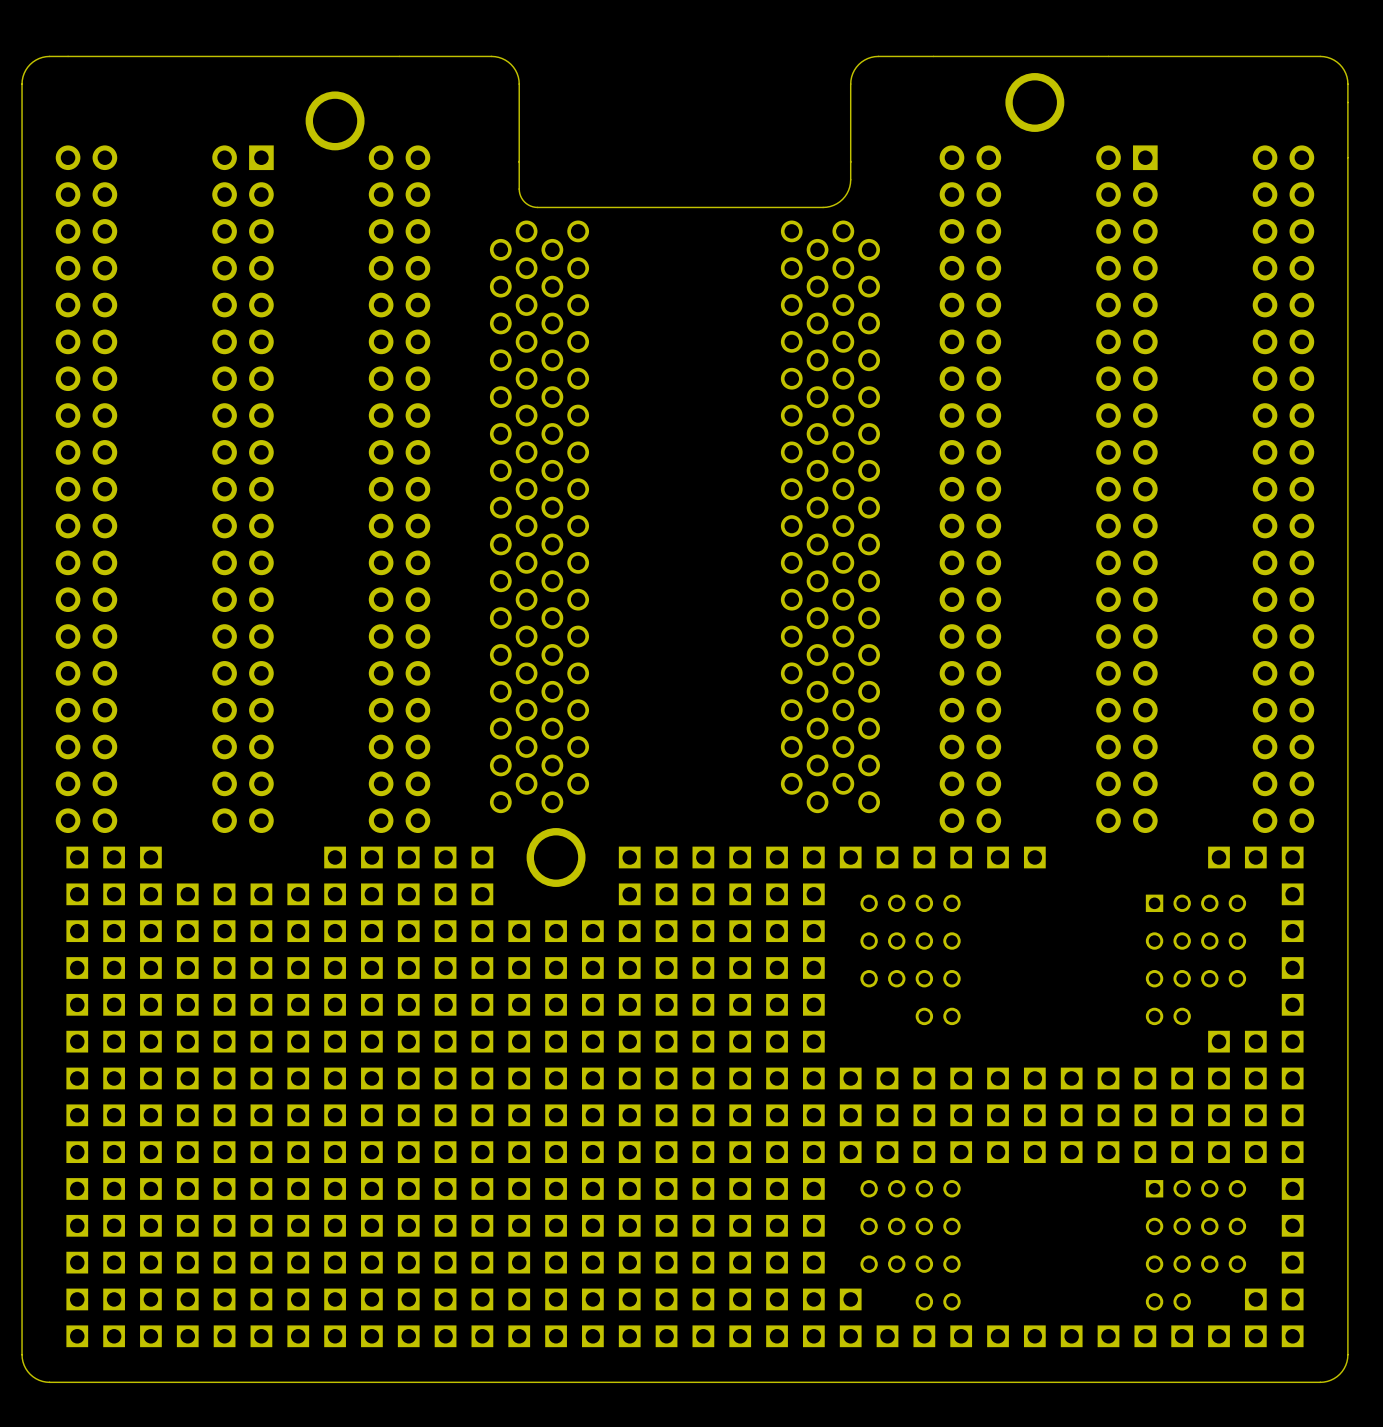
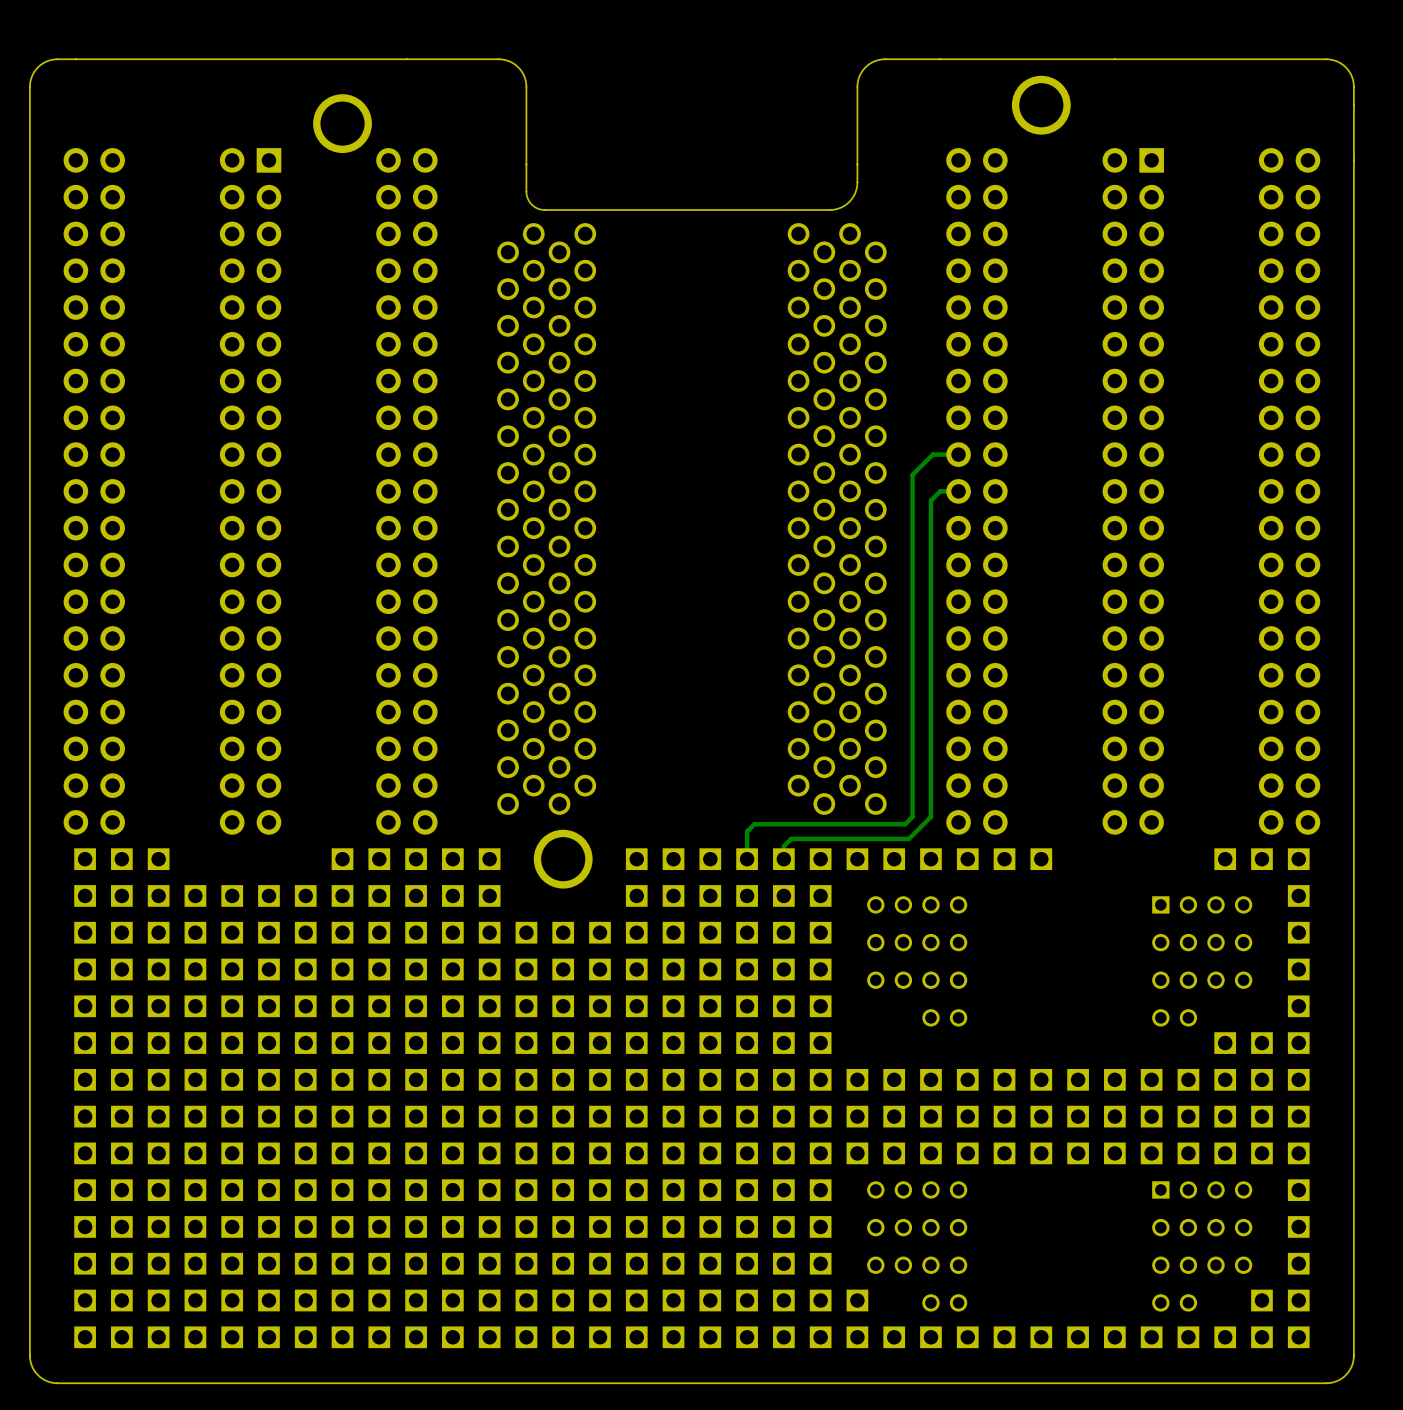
track: none -> (958, 454) (932, 454) (912, 474) (912, 816) (905, 824) (754, 824) (747, 831) (747, 859)
track: none -> (958, 491) (940, 491) (930, 500) (930, 816) (908, 838) (791, 838) (783, 846) (783, 859)

